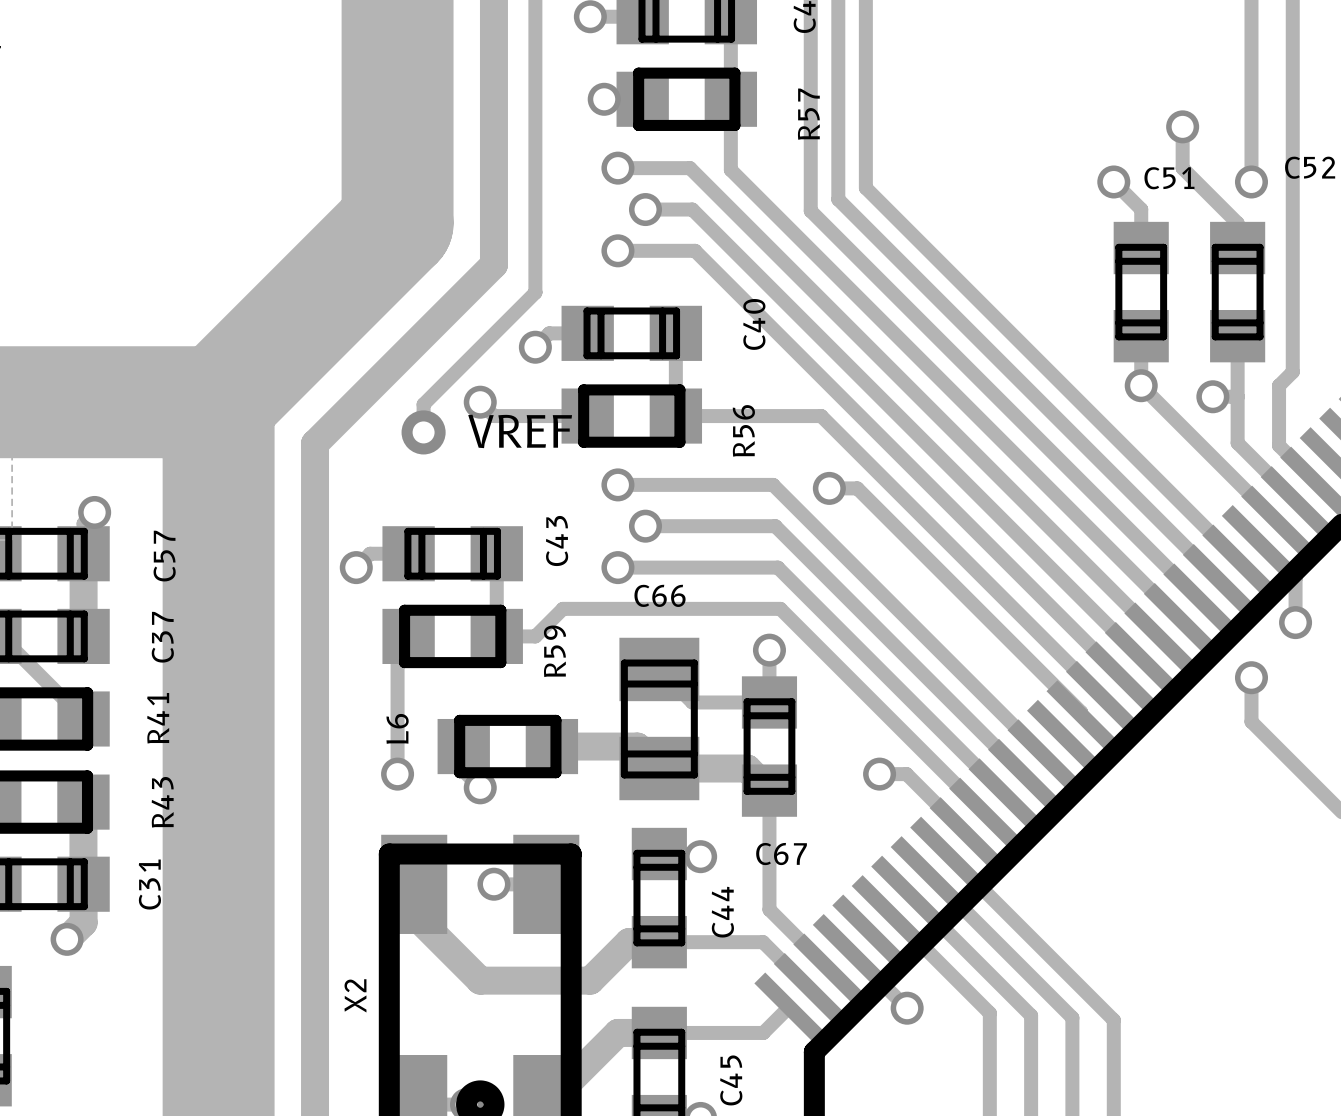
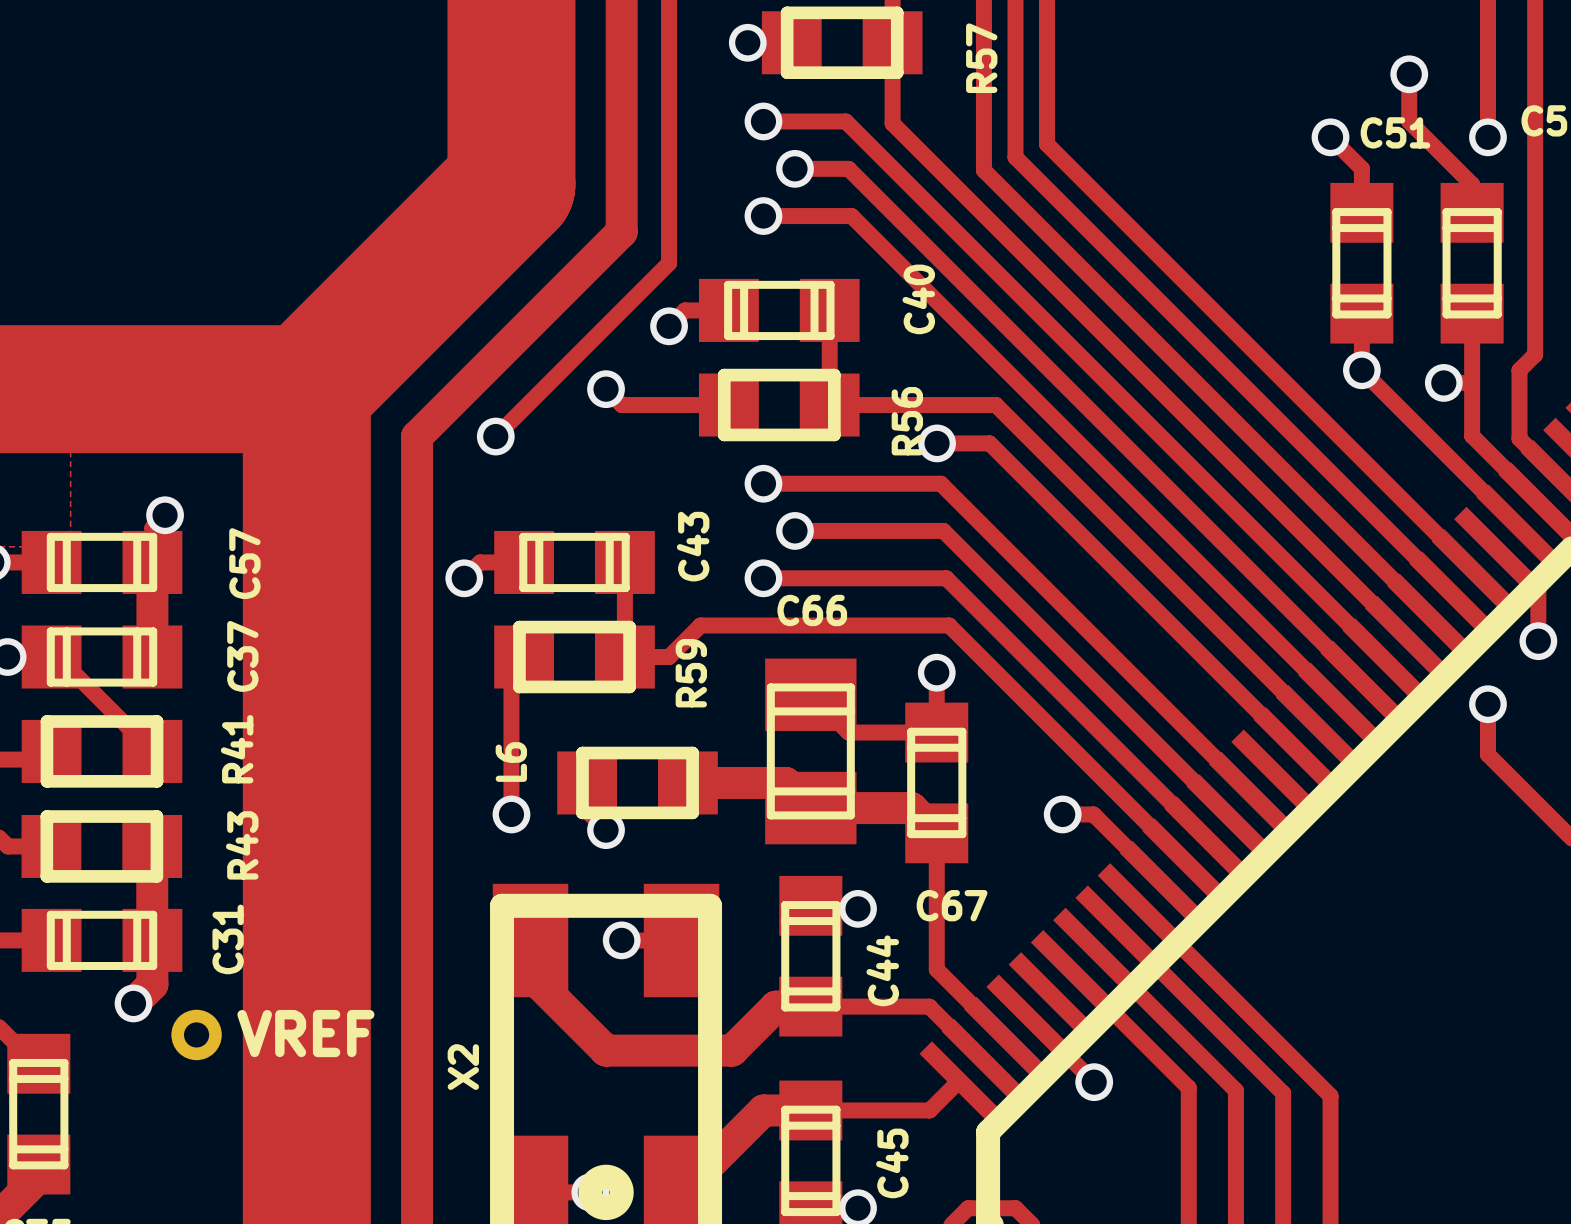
track: (535, 292) (423, 404) (423, 432) -> (669, 263) (495, 436)
part position: (423, 432) -> (196, 1034)
via: none -> (495, 436)
track: (829, 488) (857, 488) (1081, 712) (1081, 715) -> (937, 443) (989, 443) (1293, 746)
via position: (829, 488) -> (937, 443)

